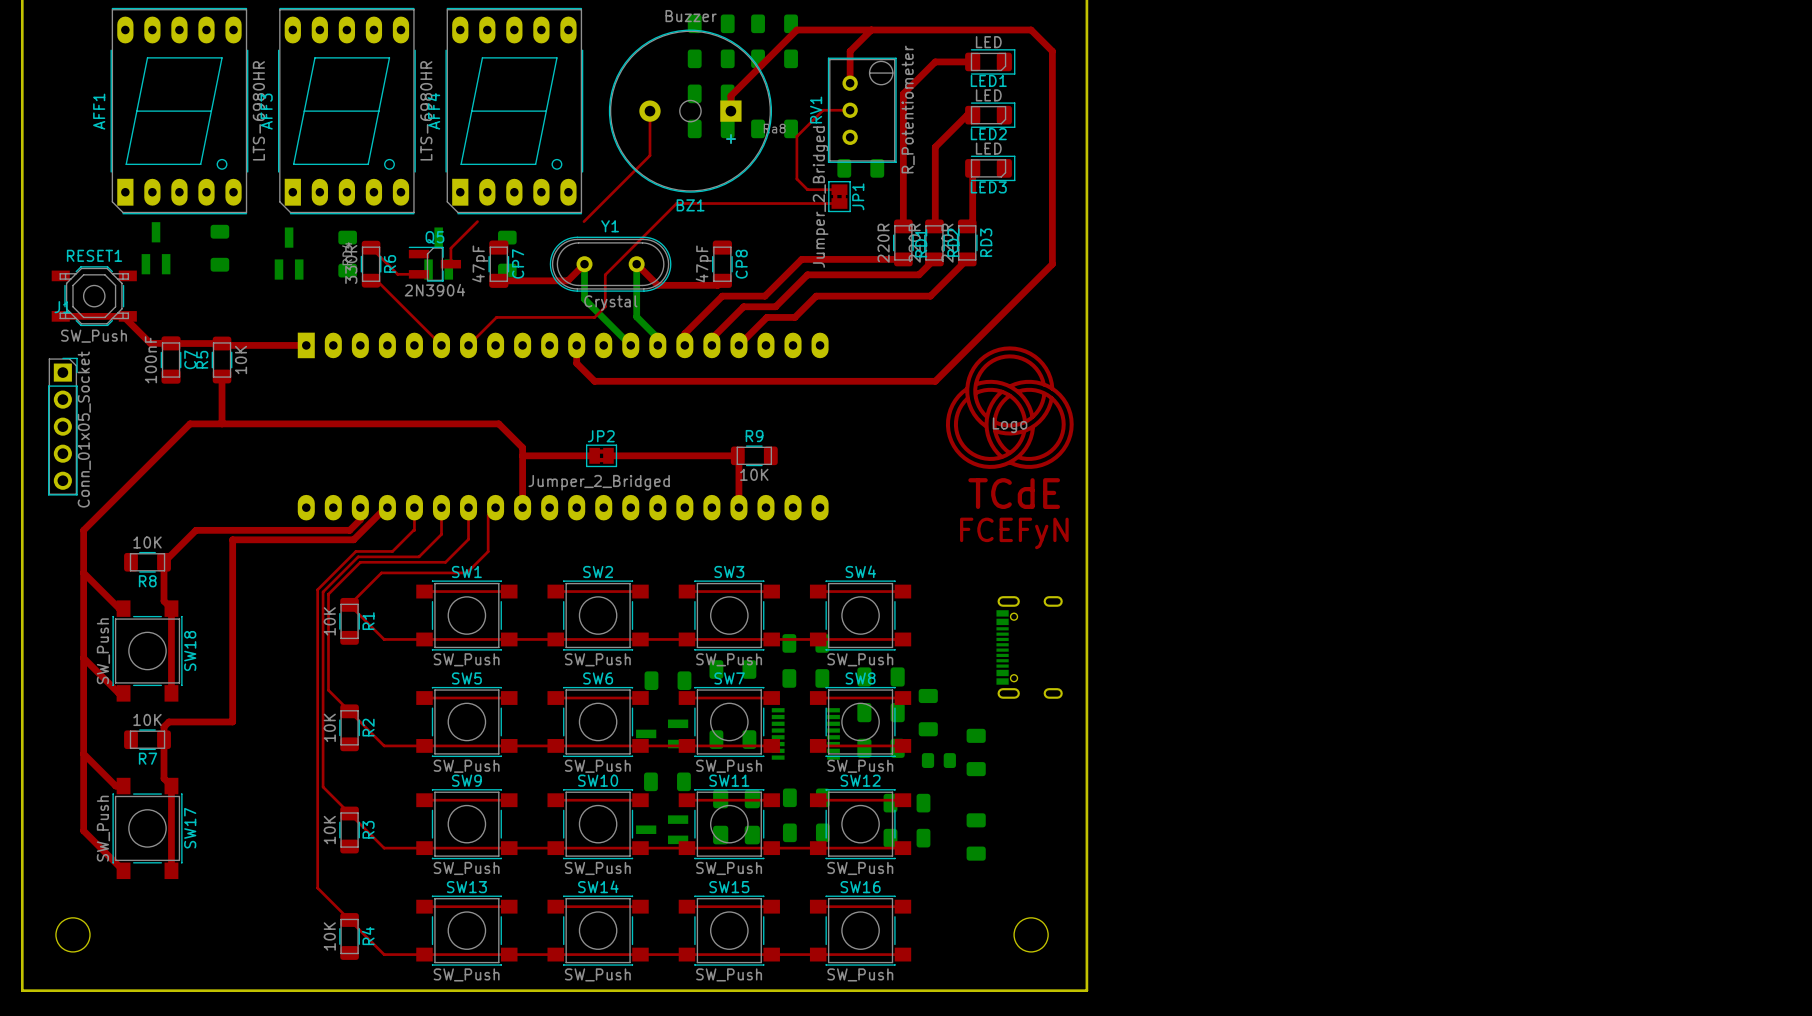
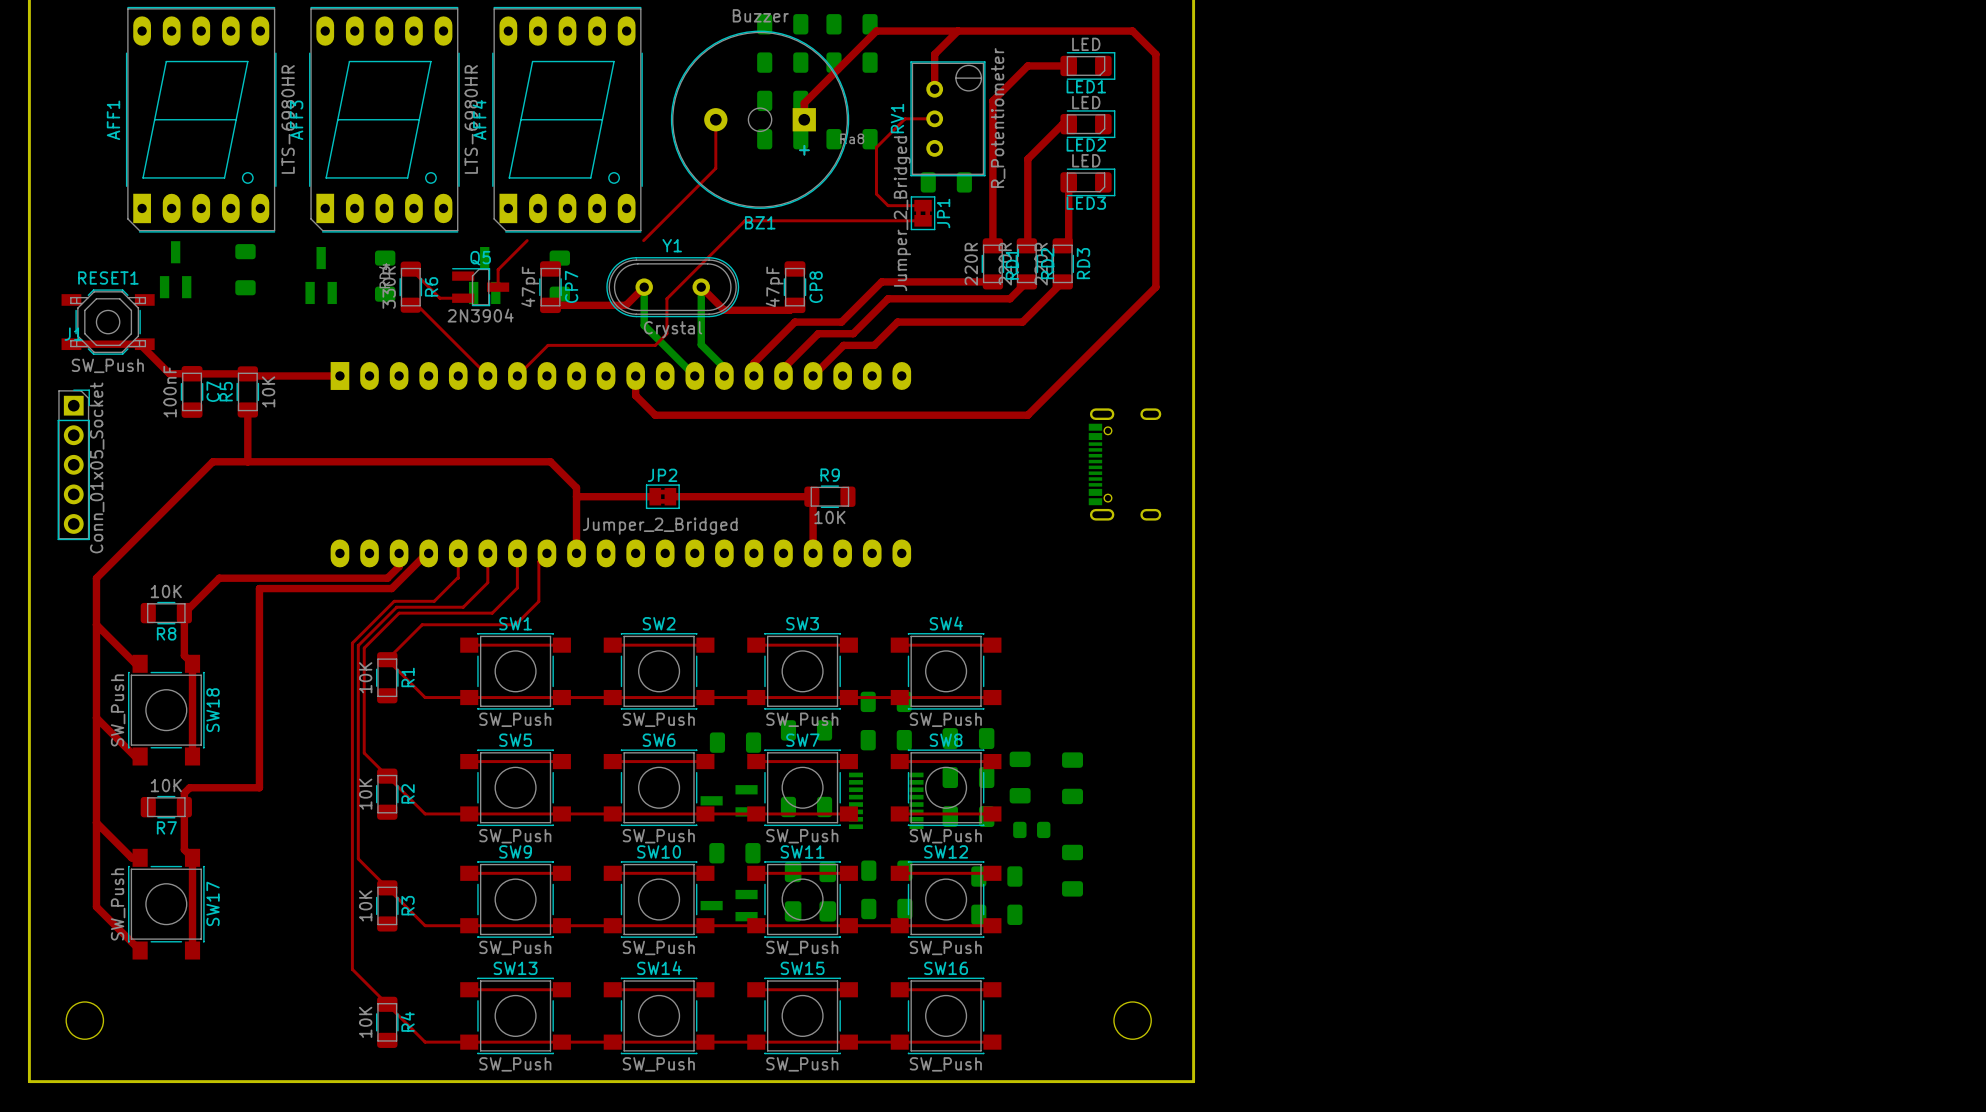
drawing: [945, 346, 1074, 469] -> none
part position: (1029, 647) -> (1125, 464)
part: none -> (1072, 778)
part: (976, 752) -> none
part: none -> (1072, 870)
part: (976, 836) -> none

